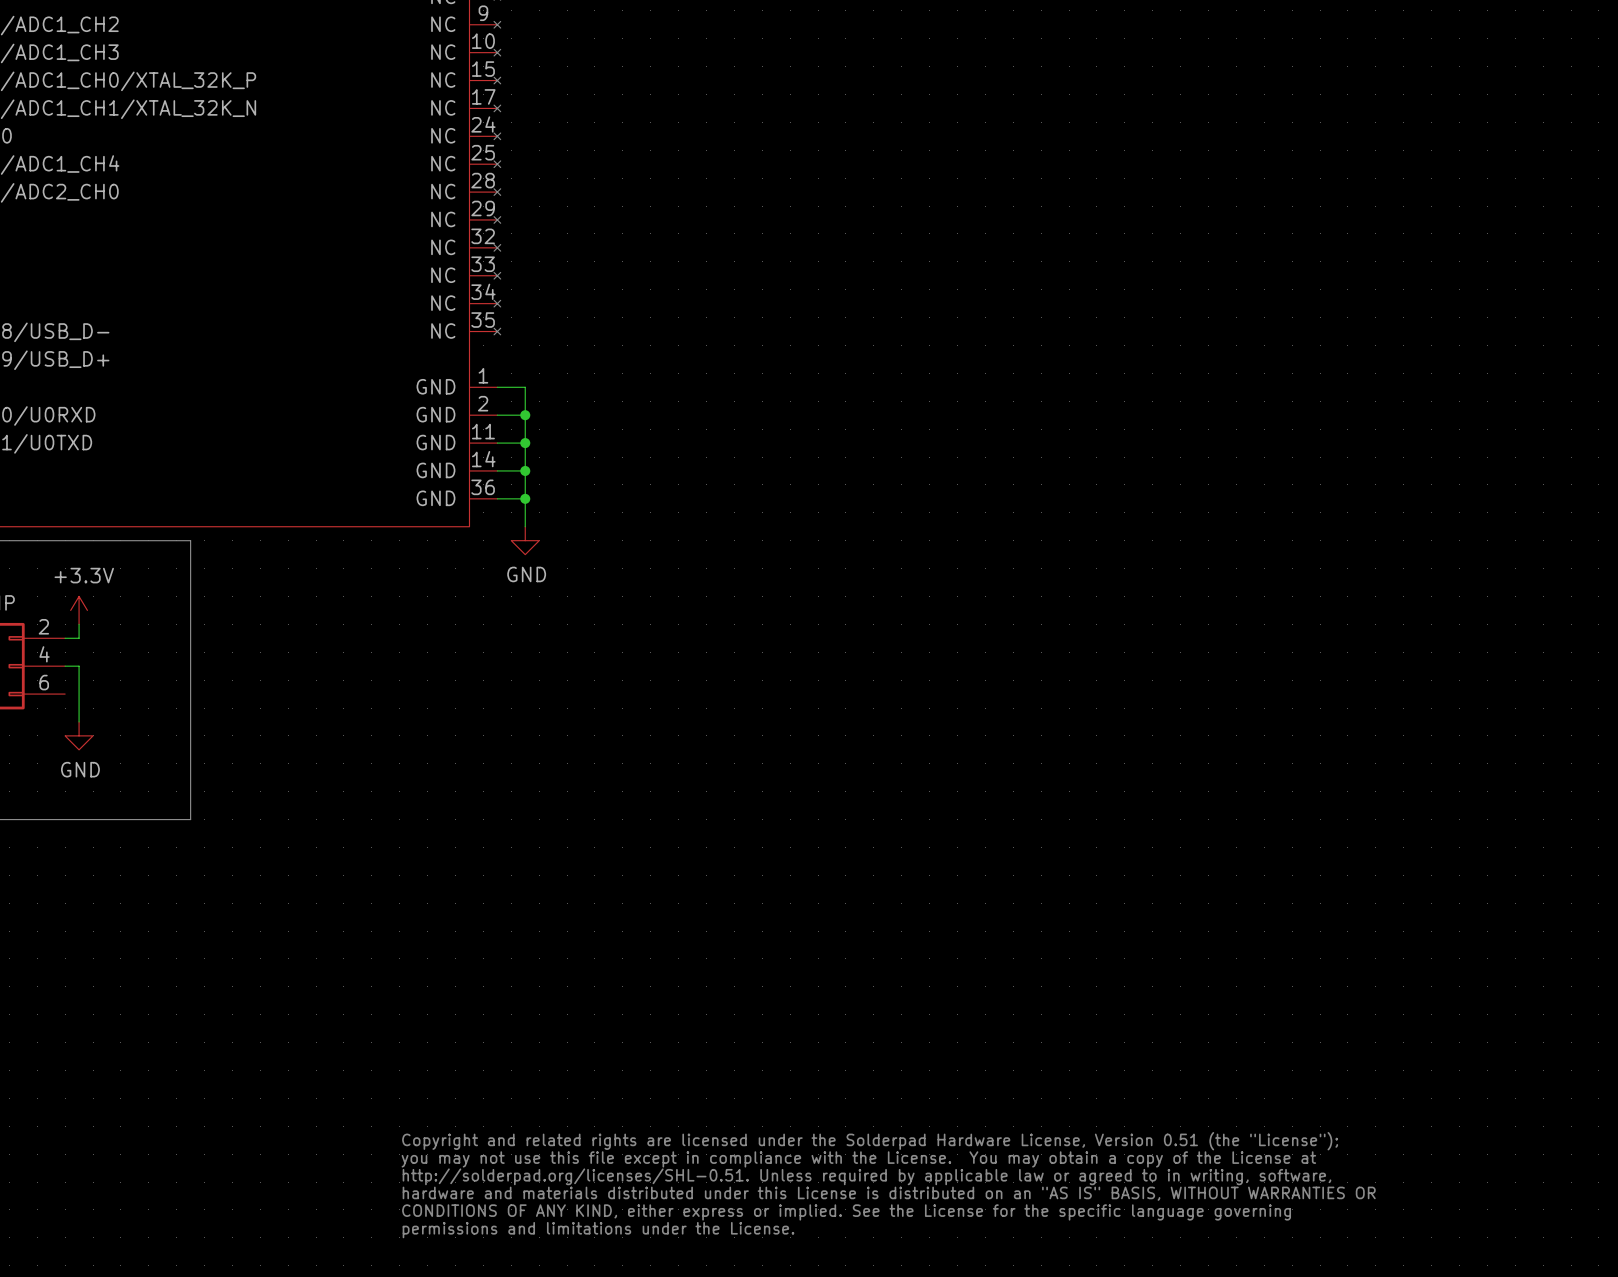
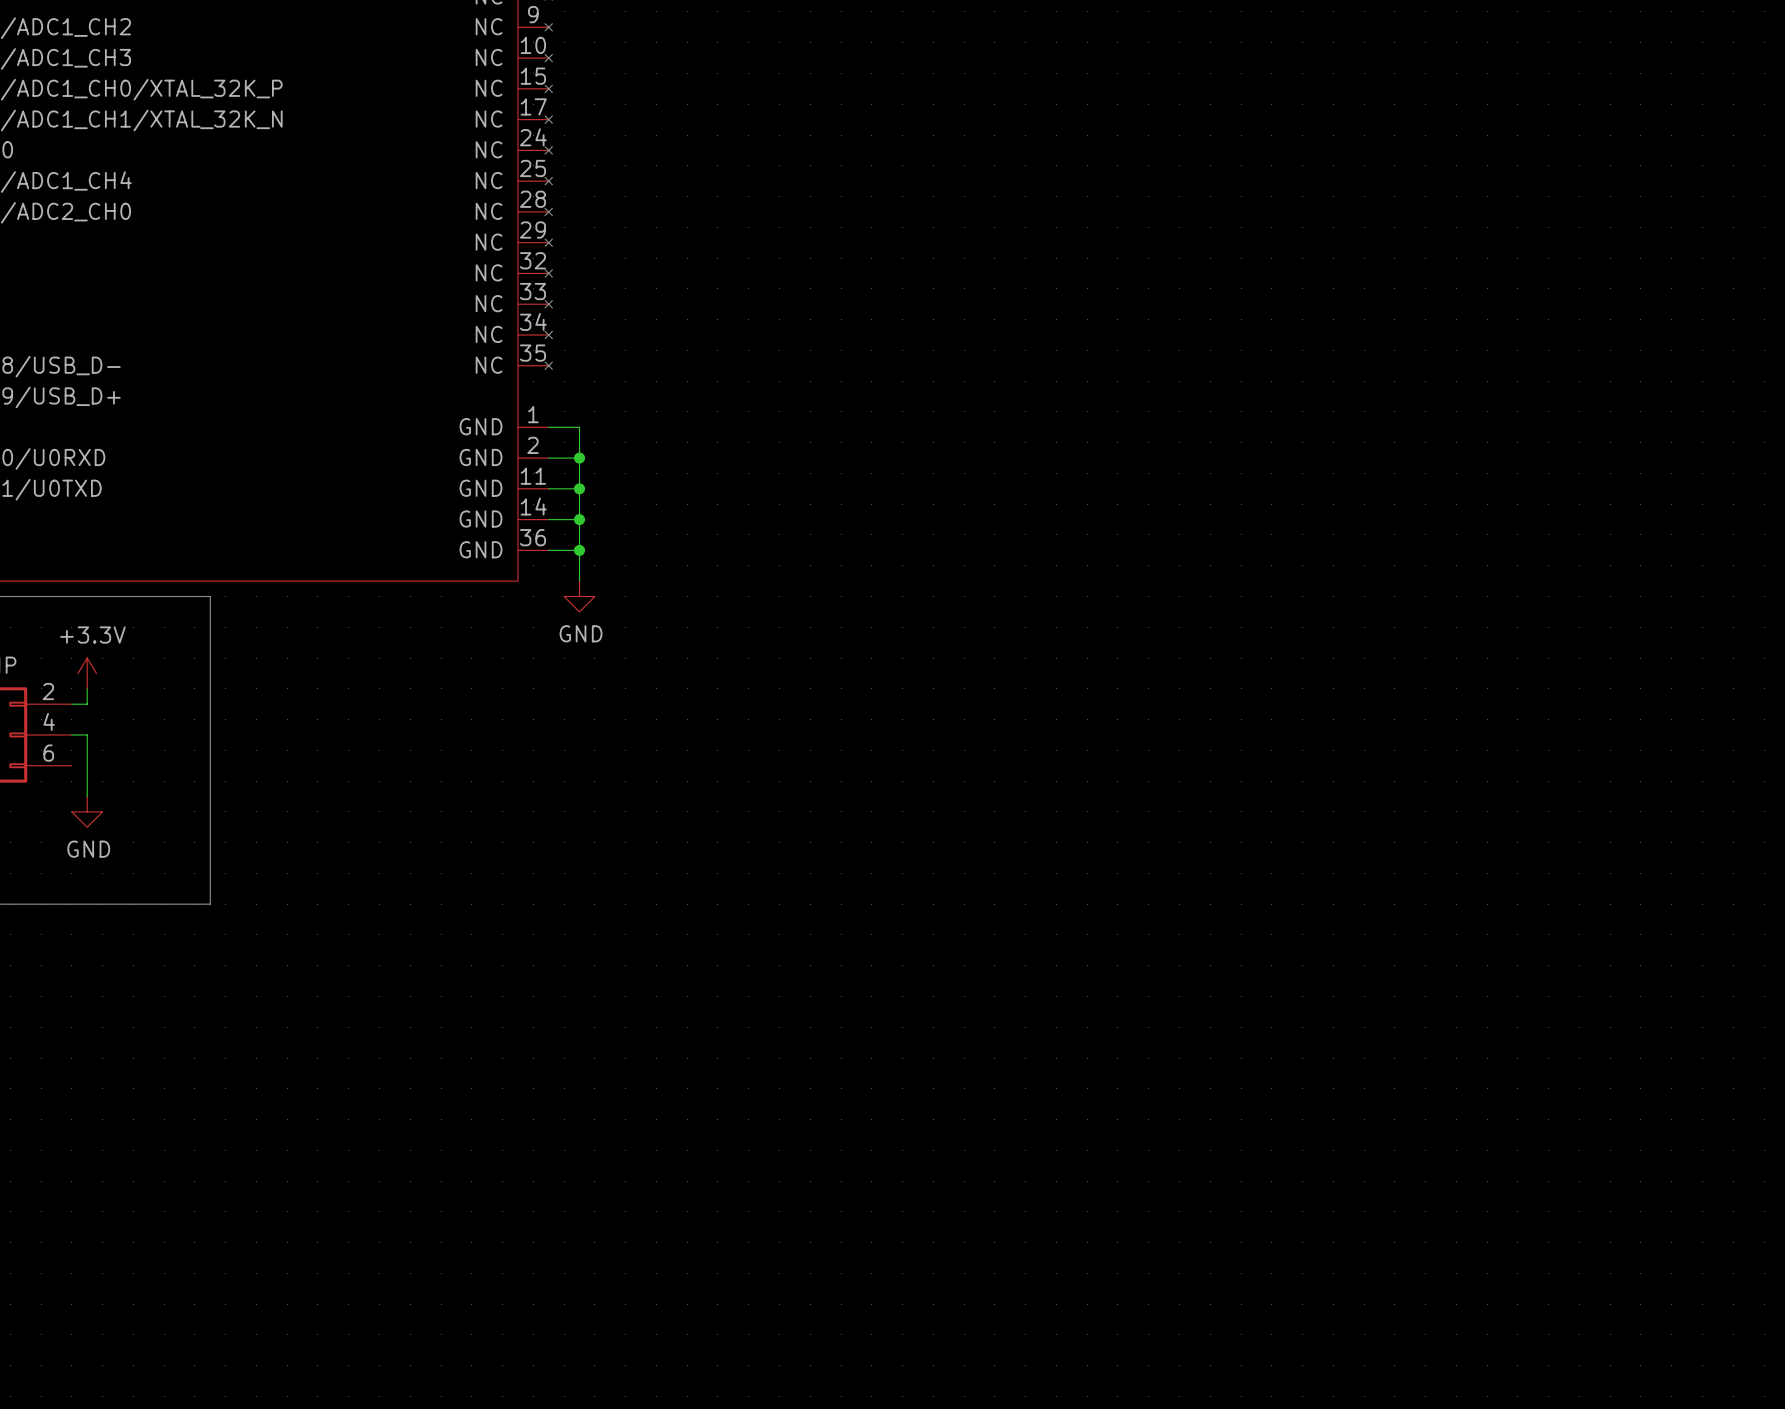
text: Copyright and related rights are licensed under the Solderpad Hardware License, Version 0.51 (the "License"); (870, 1141) -> none
text: you may not use this file except in compliance with the License. You may obtain a copy of the License at (858, 1159) -> none
text: http://solderpad.org/licenses/SHL-0.51. Unless required by applicable law or agreed to in writing, software, (866, 1176) -> none
text: hardware and materials distributed under this License is distributed on an "AS IS" BASIS, WITHOUT WARRANTIES OR (889, 1193) -> none
text: CONDITIONS OF ANY KIND, either express or implied. See the License for the specific language governing (846, 1212) -> none
text: permissions and limitations under the License. (598, 1230) -> none

